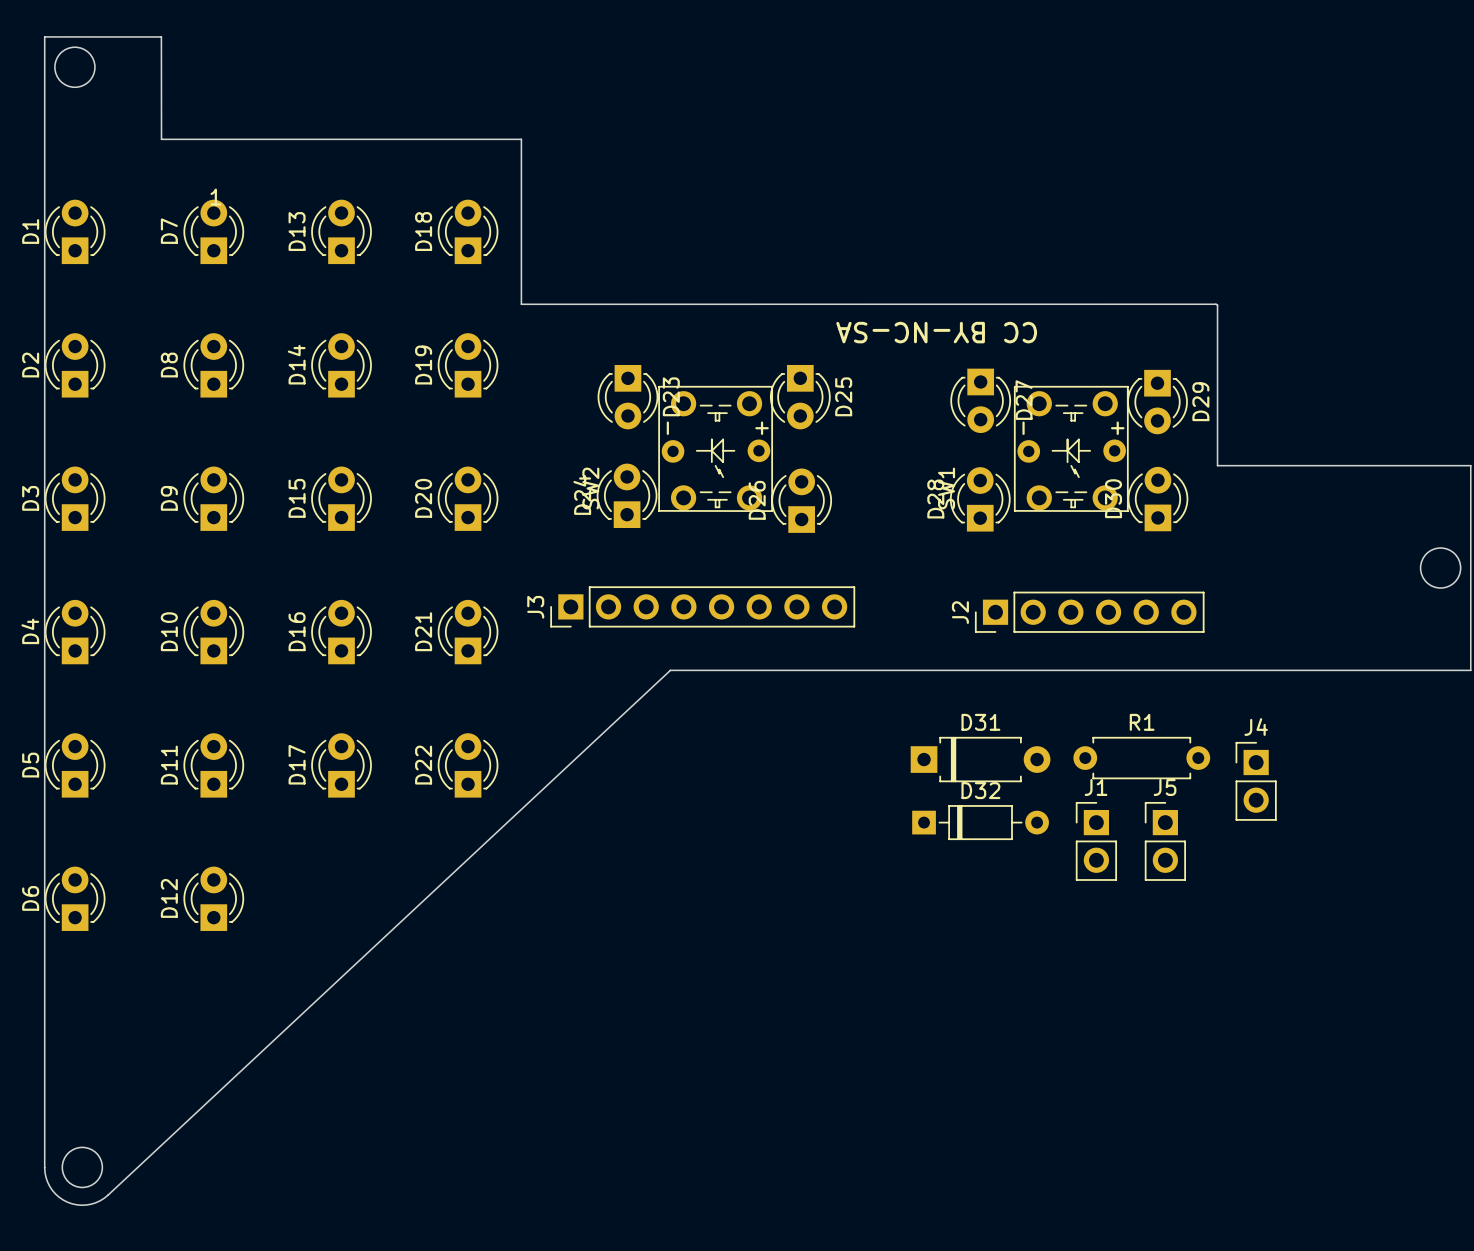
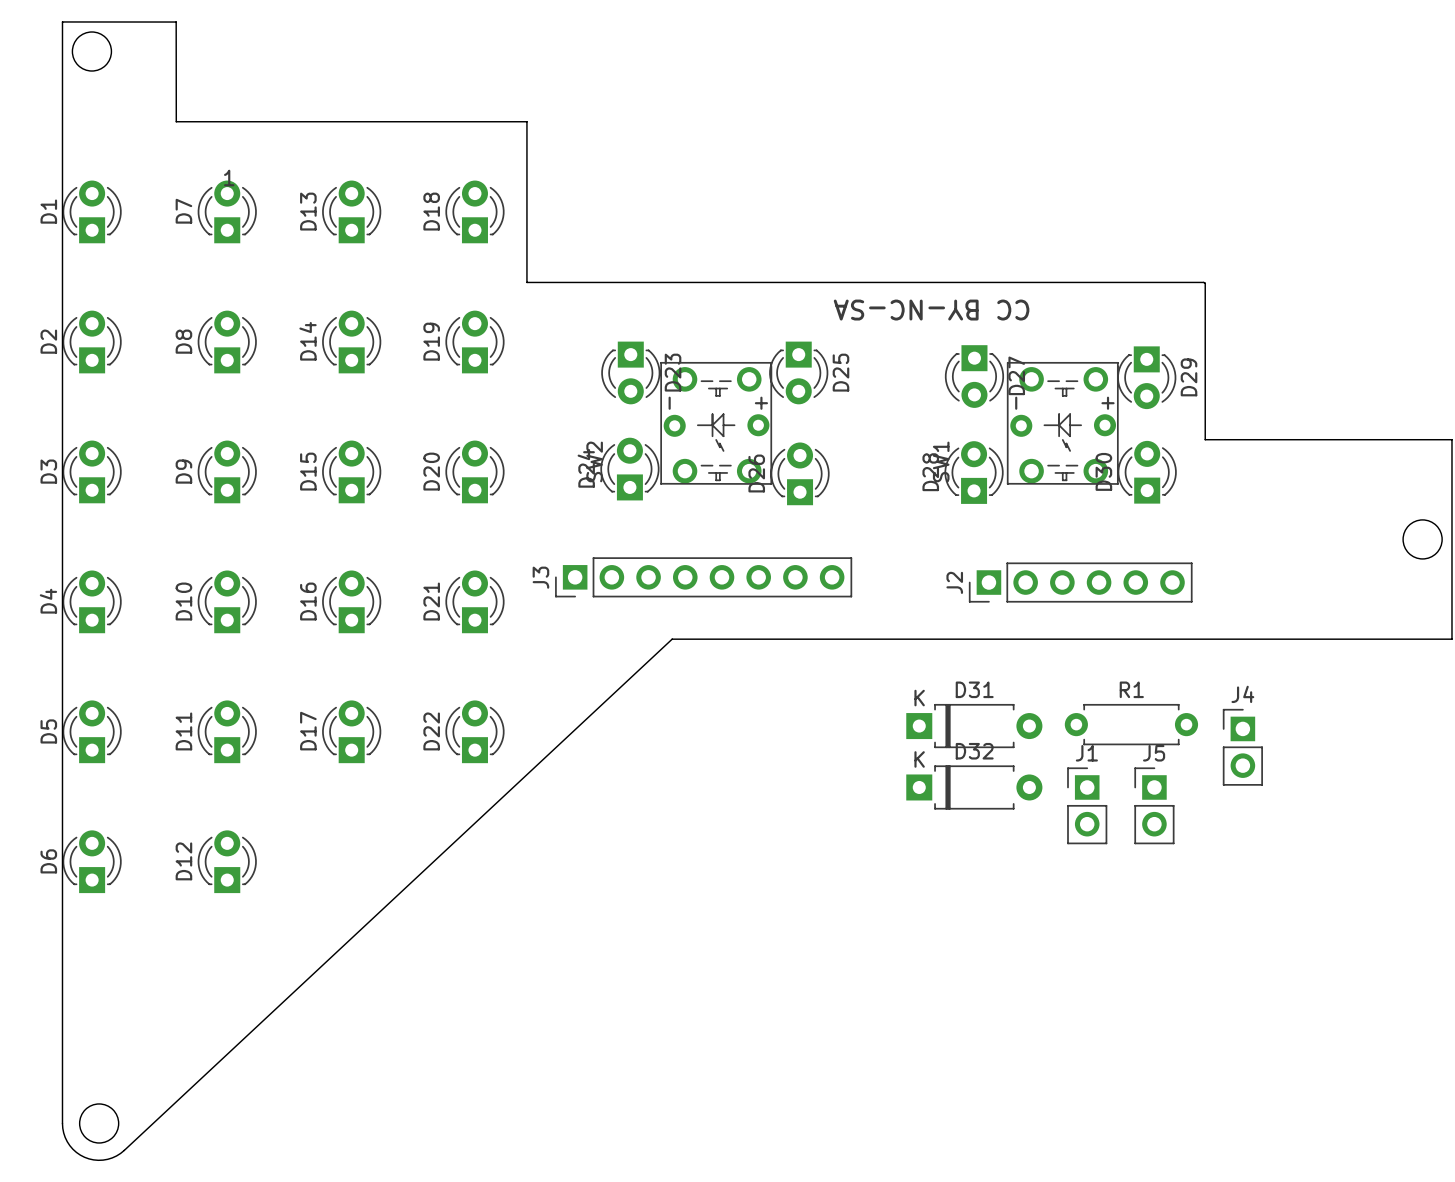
D31 text: none -> K (919, 698)
D32 footprint: [912, 805, 1049, 841] -> [906, 765, 1043, 810]

